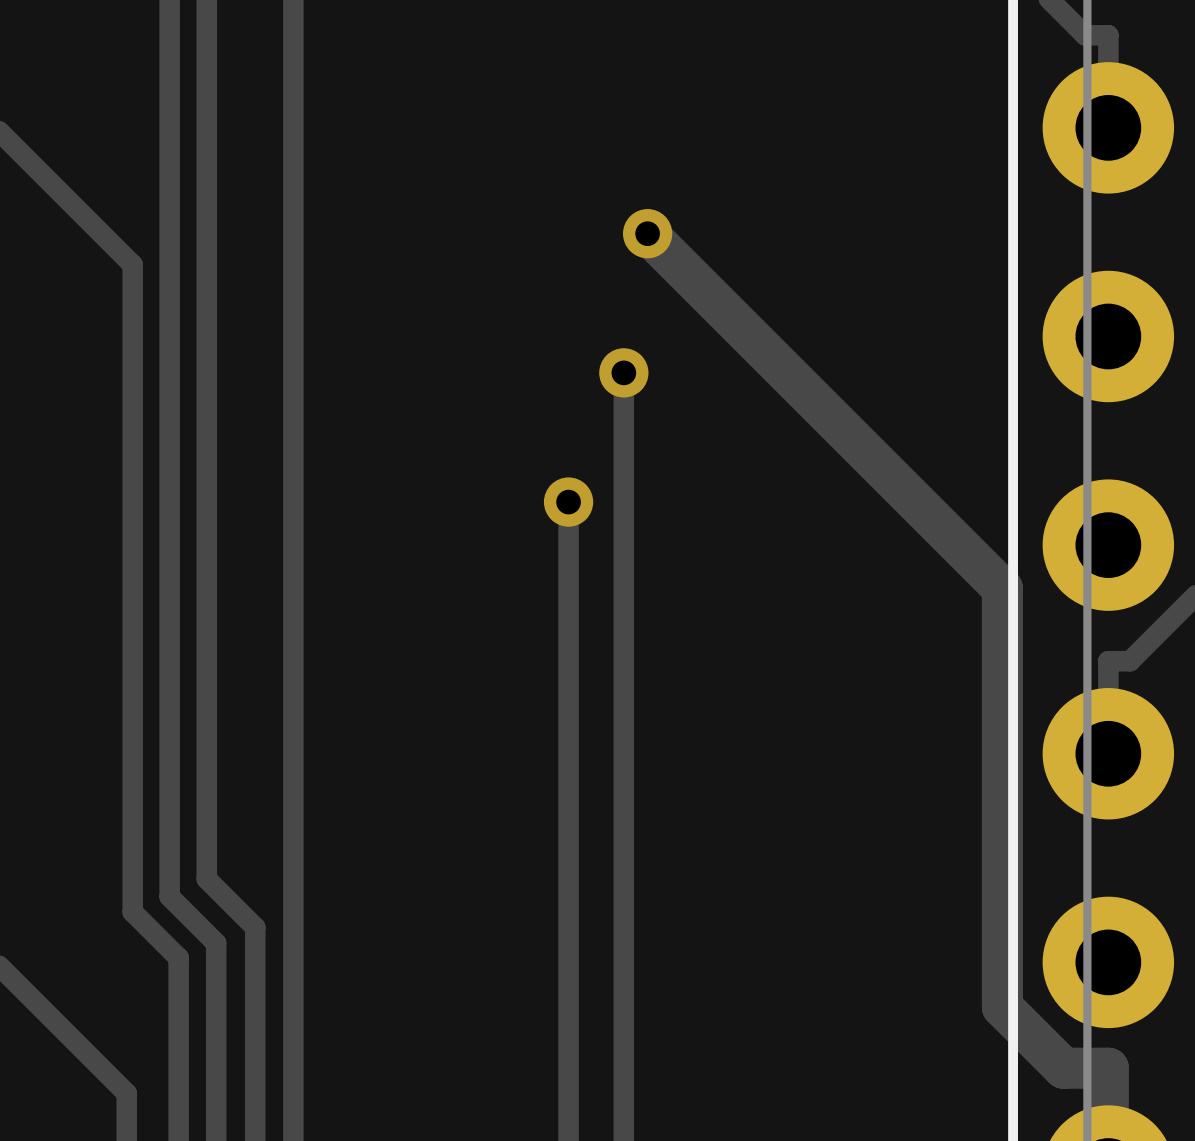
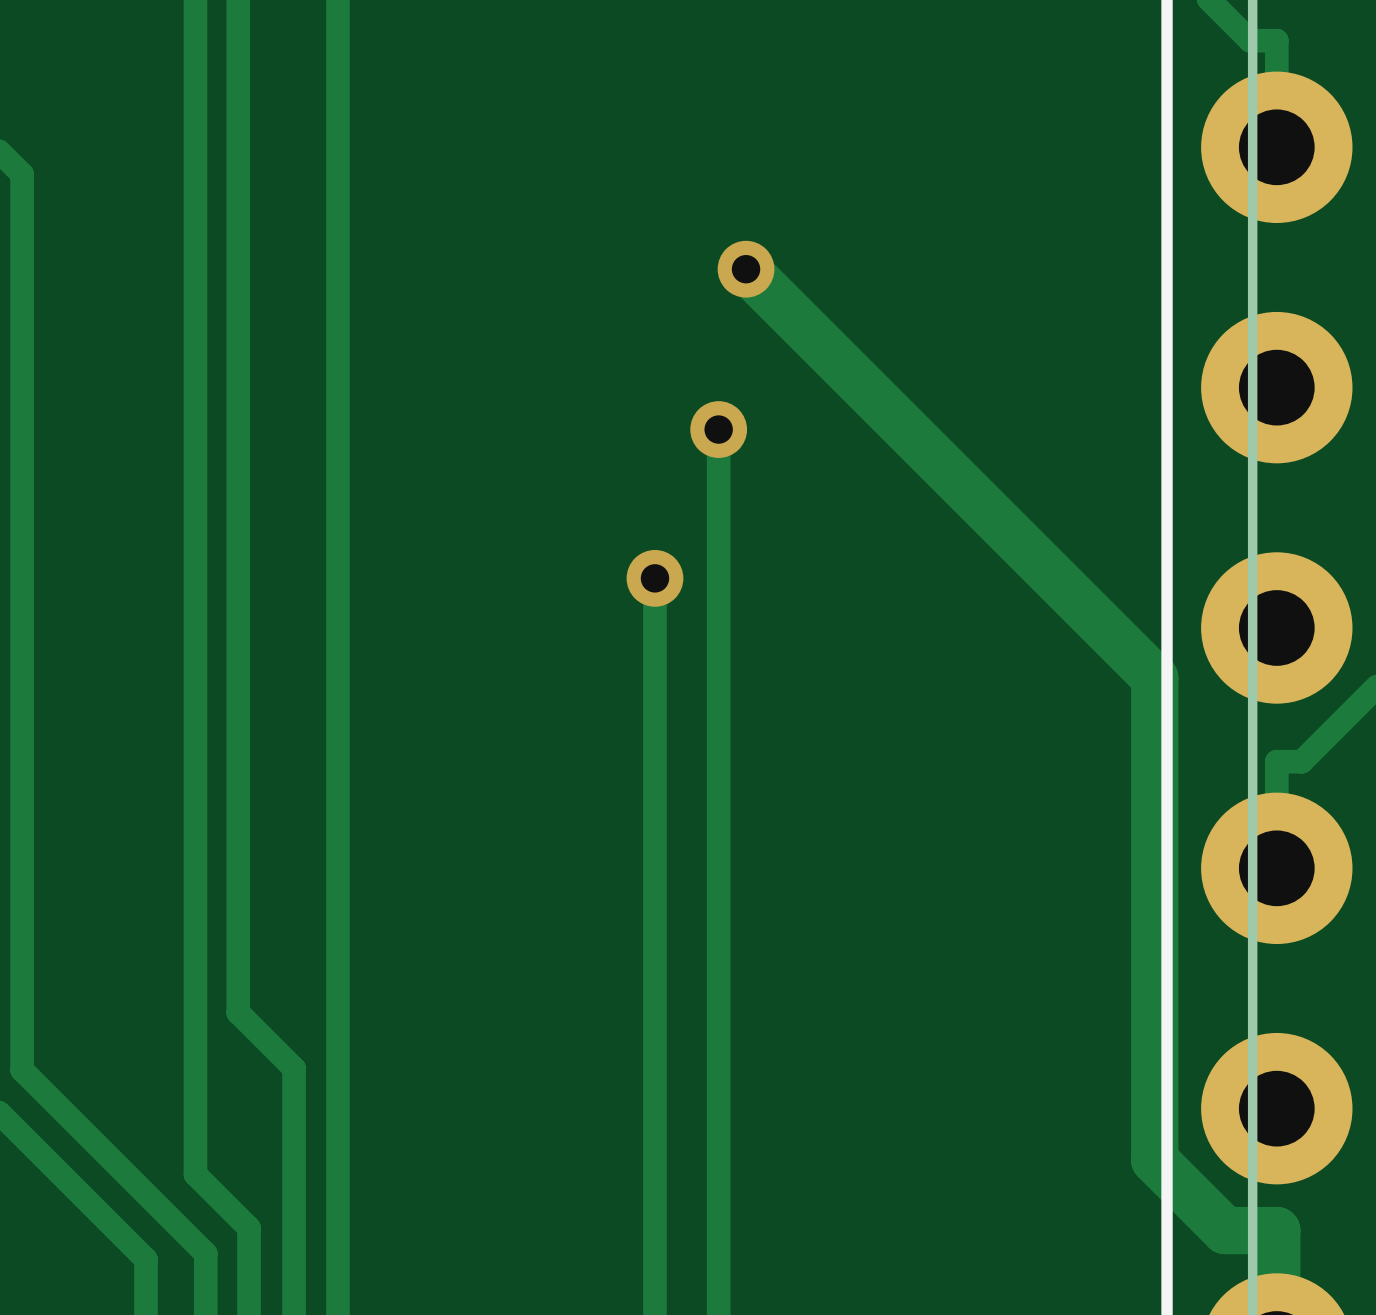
track: (19, 151) (132, 264) (132, 912) (178, 957) (178, 1088) -> (22, 174) (22, 1070) (205, 1253)
track: (169, 896) (216, 943) (216, 1065) -> (195, 1033) (195, 1174) (249, 1227)

